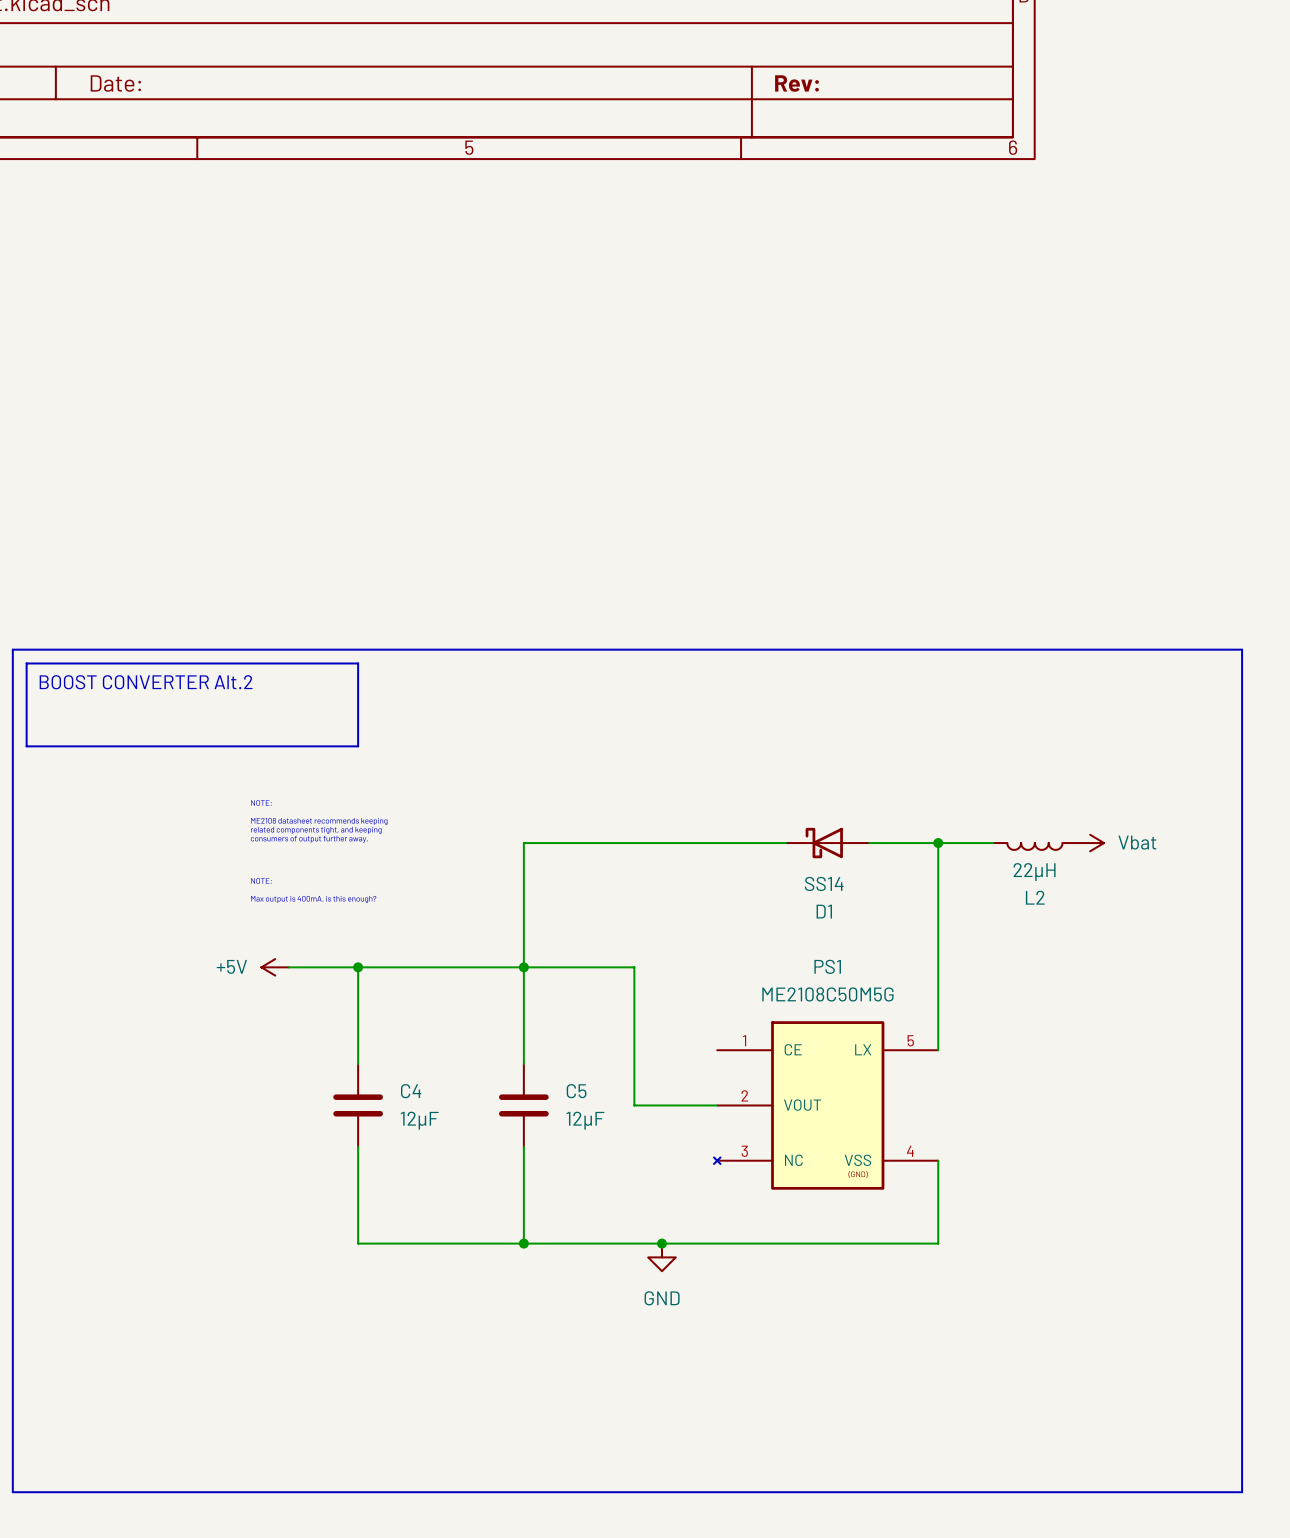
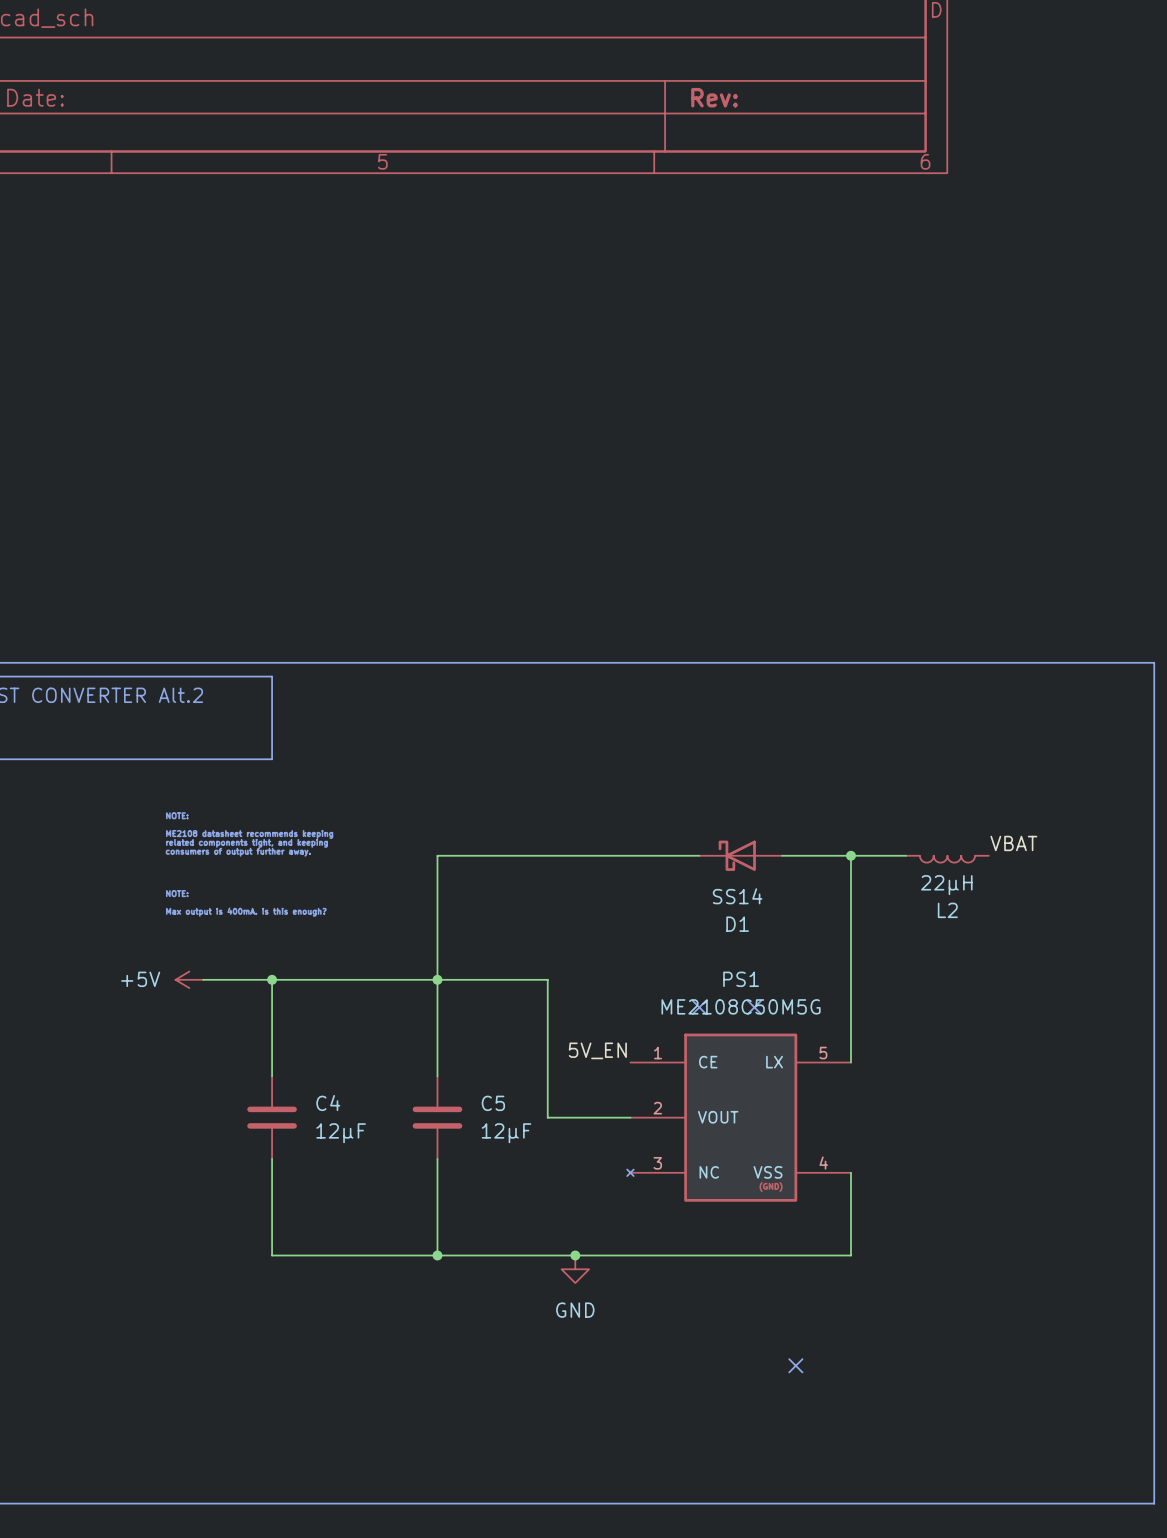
label: none -> VBAT (1013, 843)
power symbol: Vbat (1090, 843) -> none
no-connect mark: none -> (699, 1007)
no-connect mark: none -> (754, 1007)
label: none -> 5V_EN (597, 1050)
no-connect mark: none -> (795, 1365)

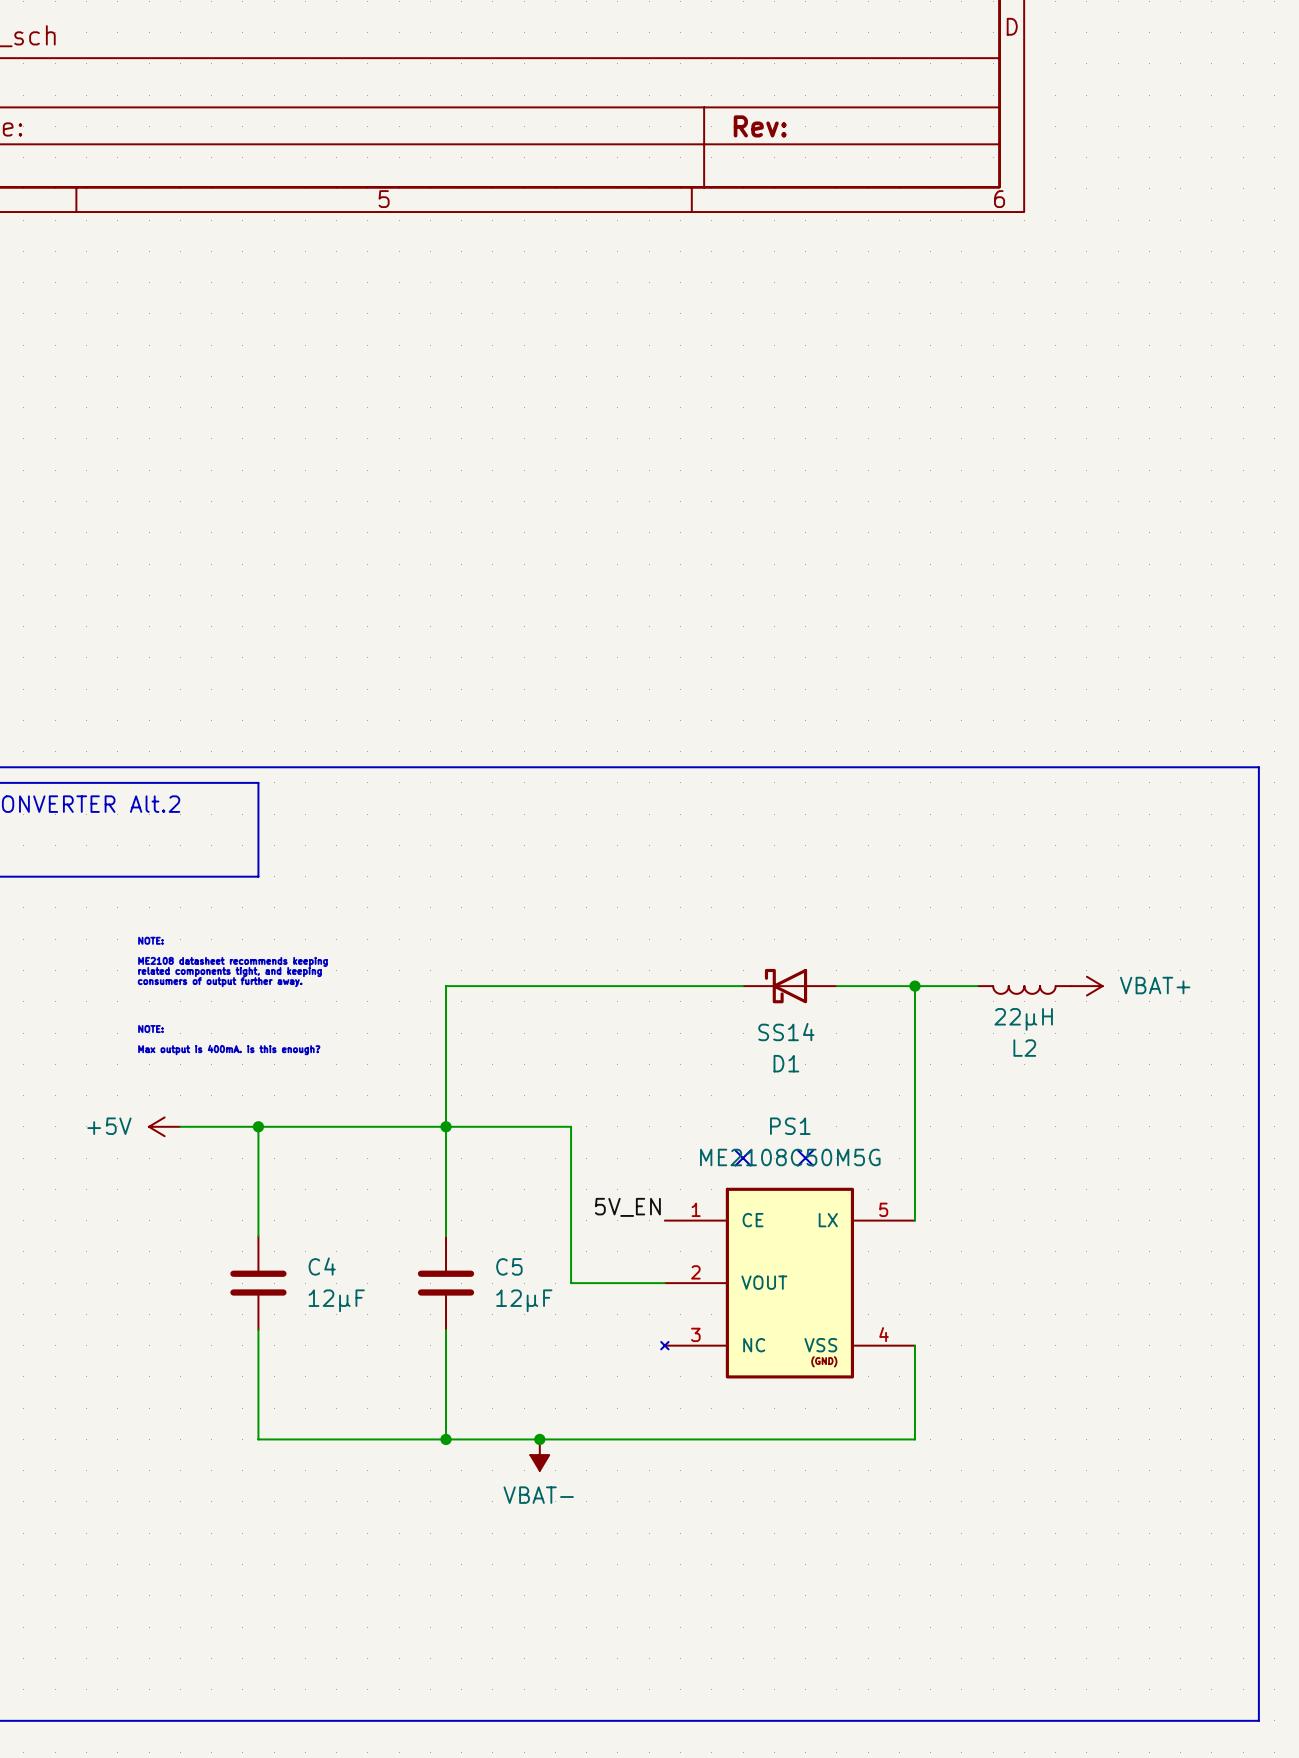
label: VBAT (1013, 843) -> none
power symbol: none -> VBAT+ (1086, 986)
junction position: (575, 1255) -> (539, 1439)
power symbol: none -> VBAT- (539, 1455)
power symbol: GND (575, 1269) -> none
no-connect mark: (795, 1365) -> none

